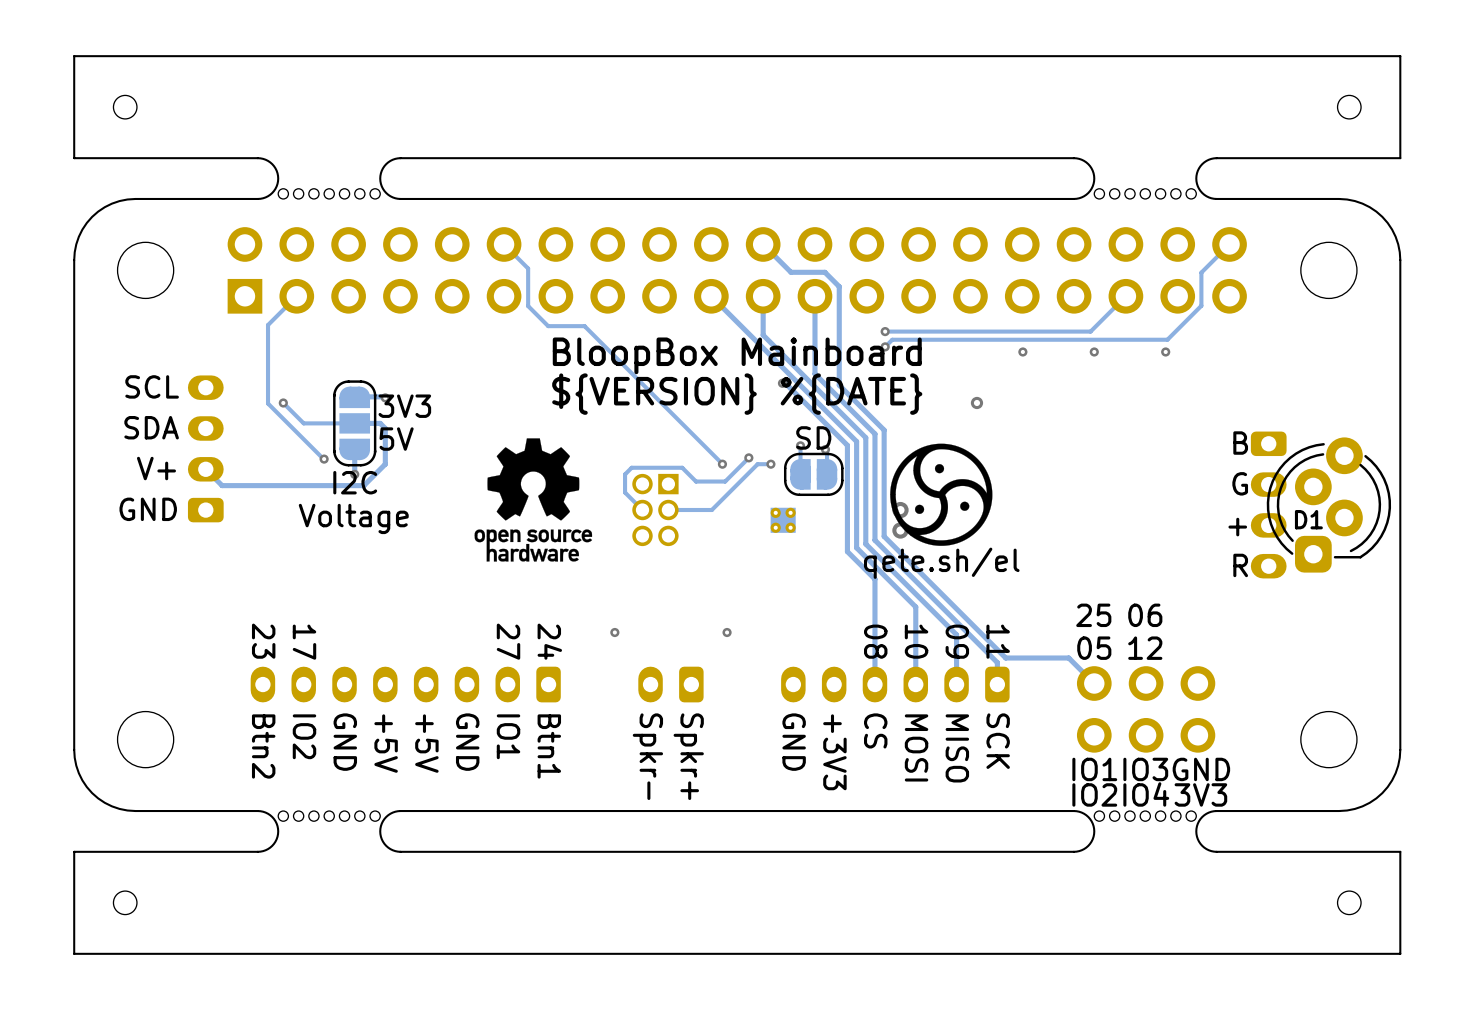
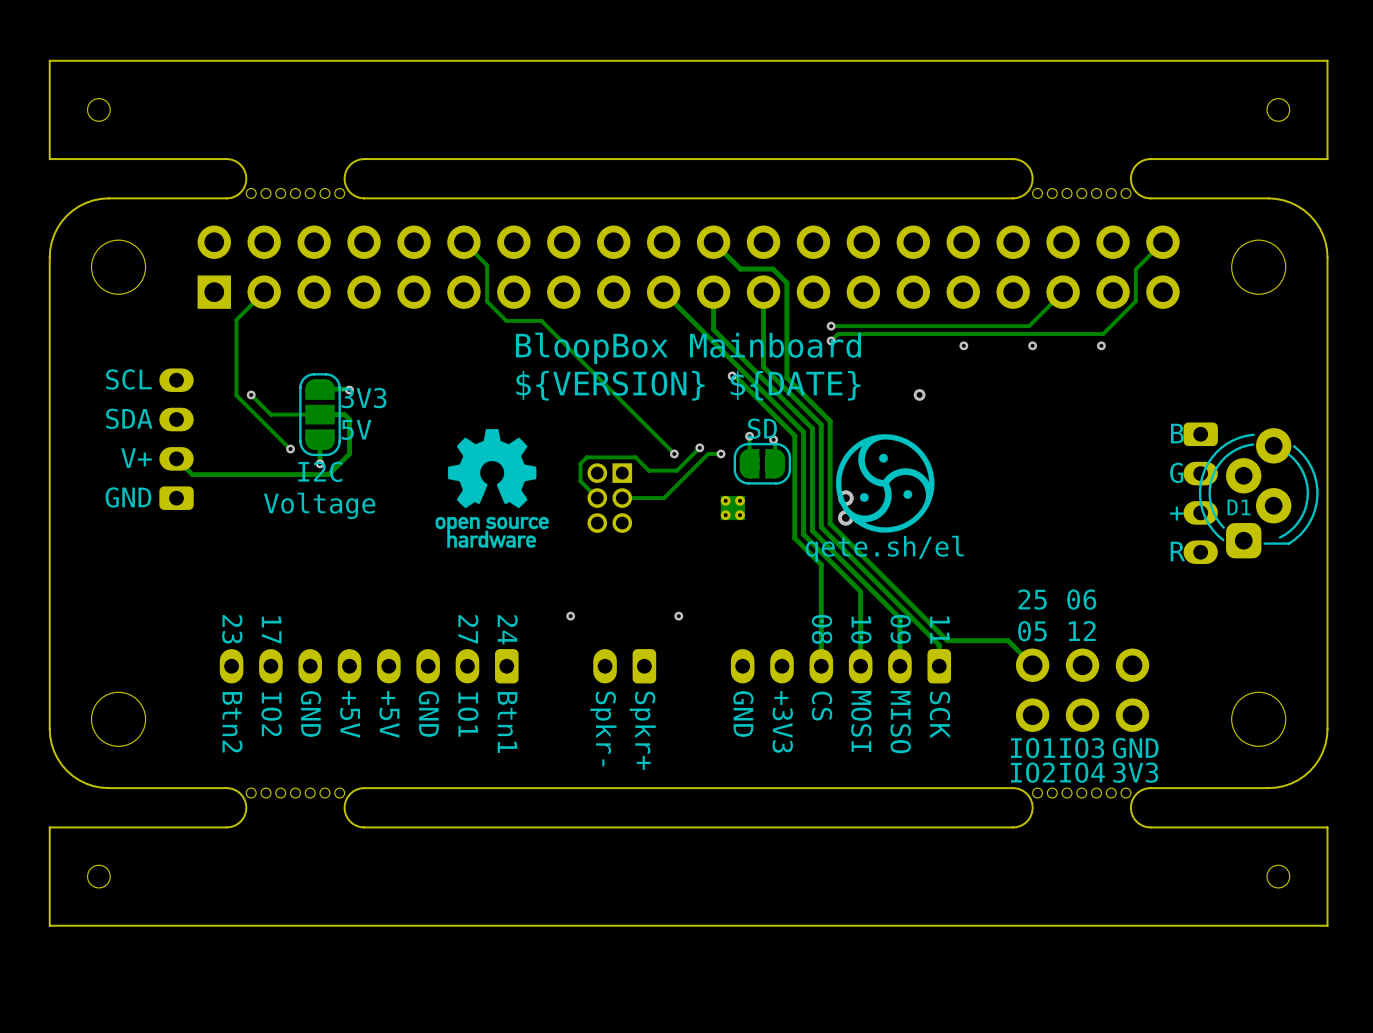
text: ${VERSION} %{DATE} (737, 394) -> ${VERSION} ${DATE} (688, 385)

